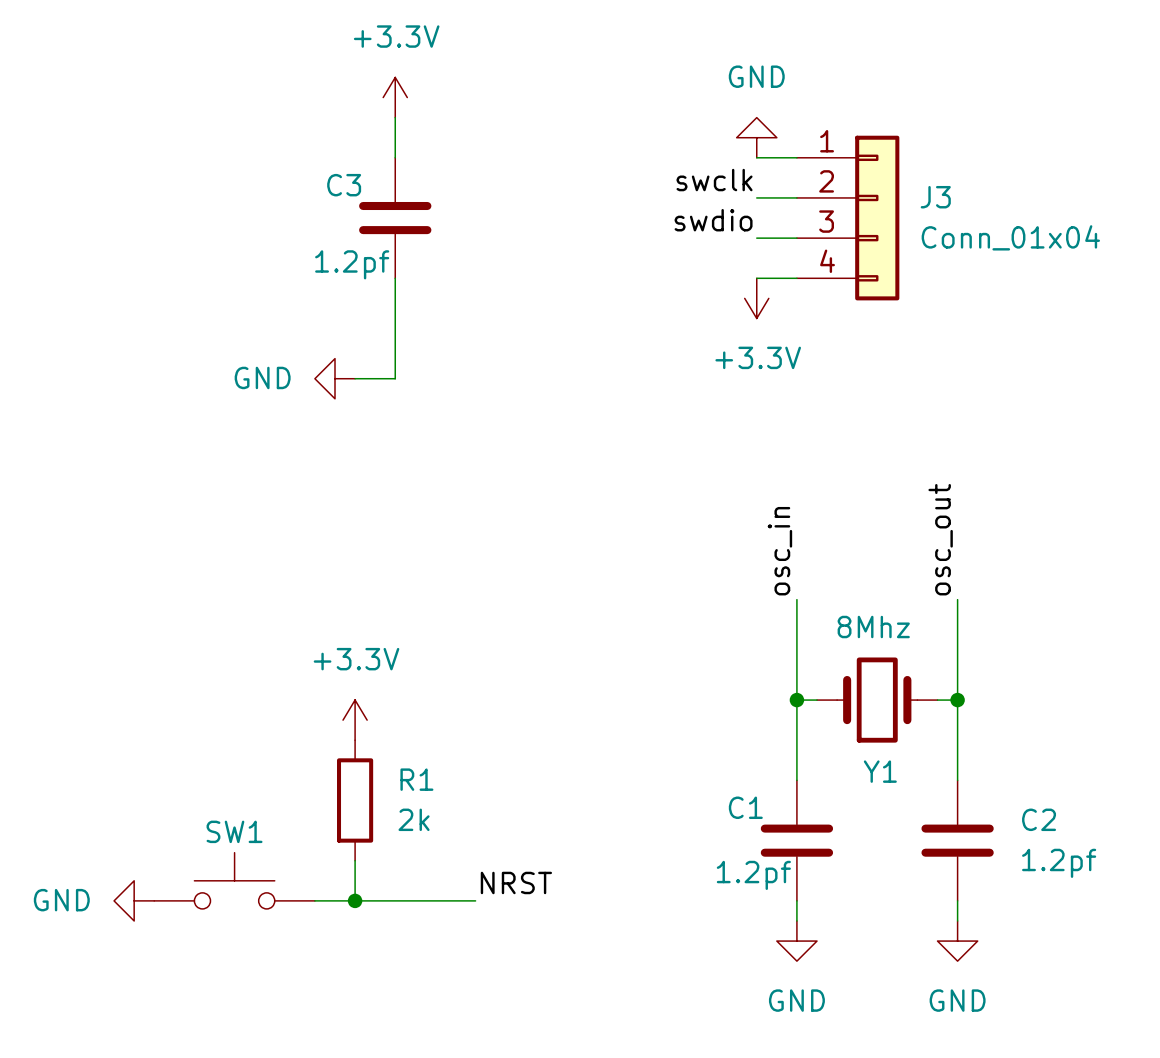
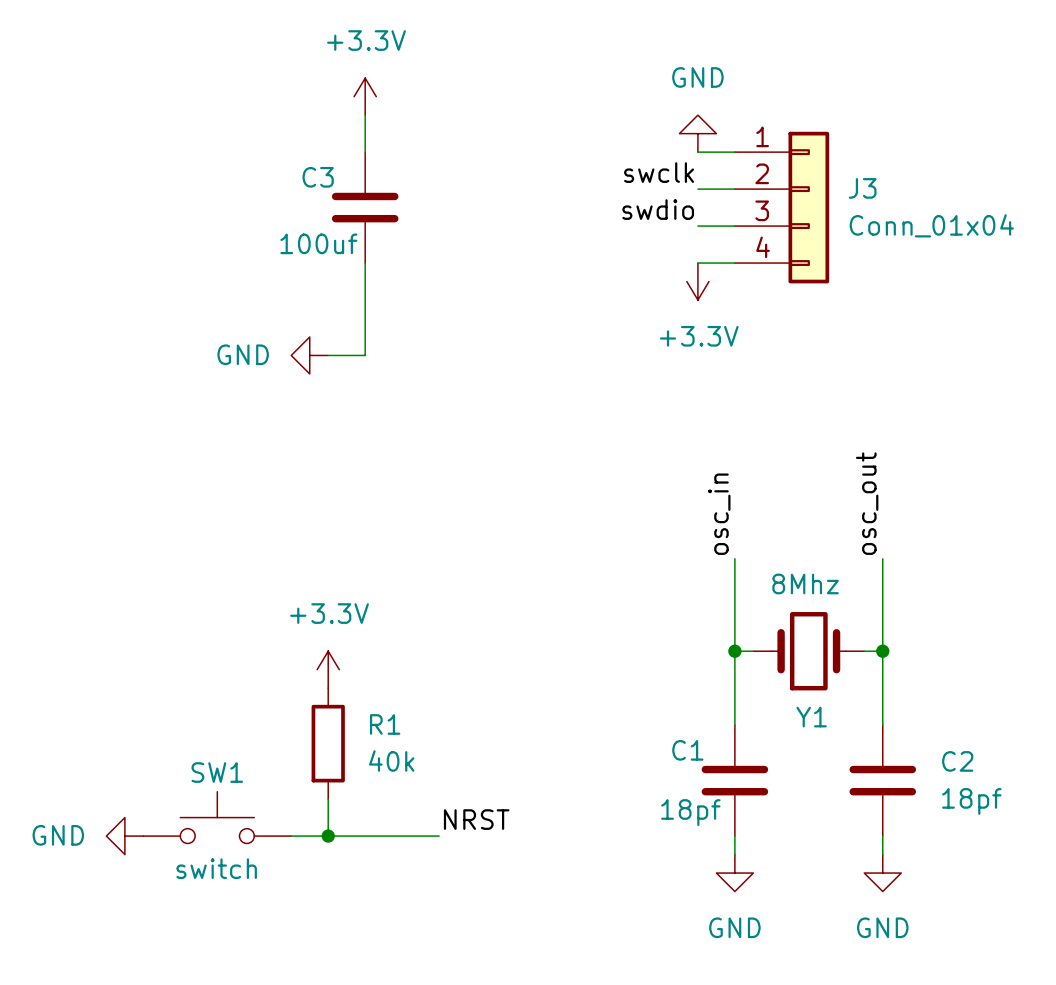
C3 value: 1.2pf (352, 264) -> 100uf (318, 243)
R1 value: 2k (414, 819) -> 40k (391, 760)
C2 value: 1.2pf (1059, 863) -> 18pf (971, 801)
C1 value: 1.2pf (753, 875) -> 18pf (690, 812)
SW1 value: none -> switch (216, 868)

